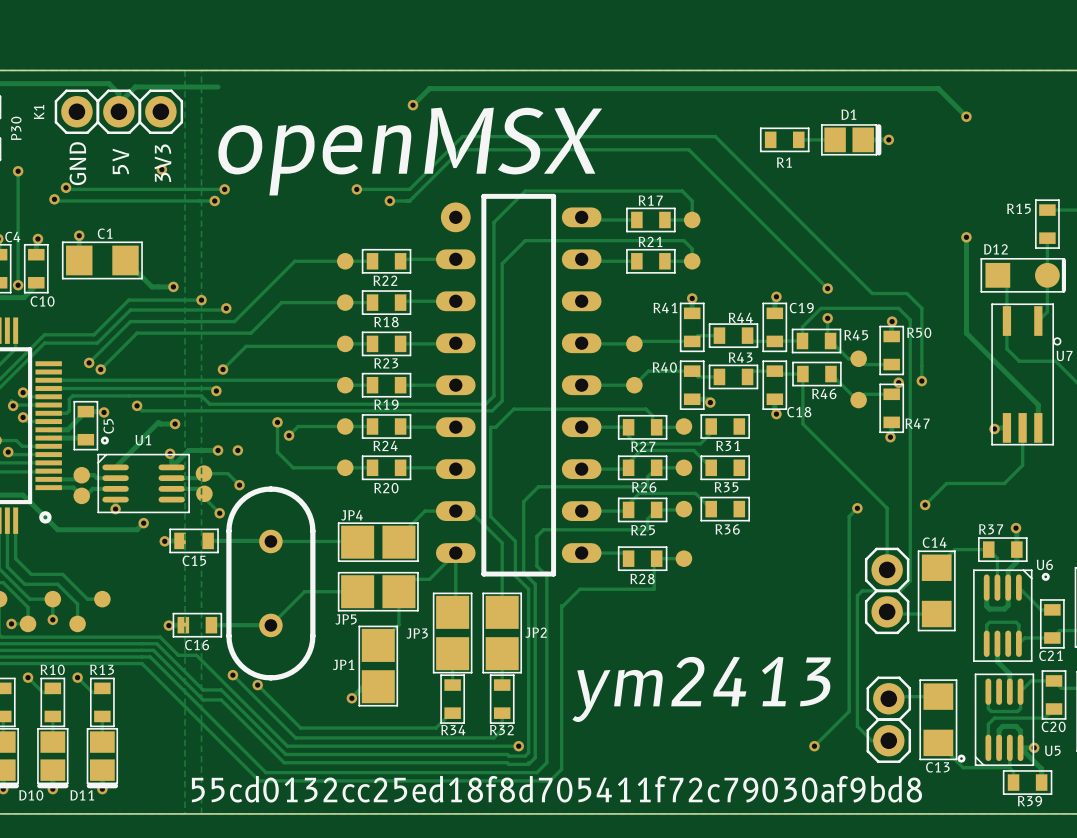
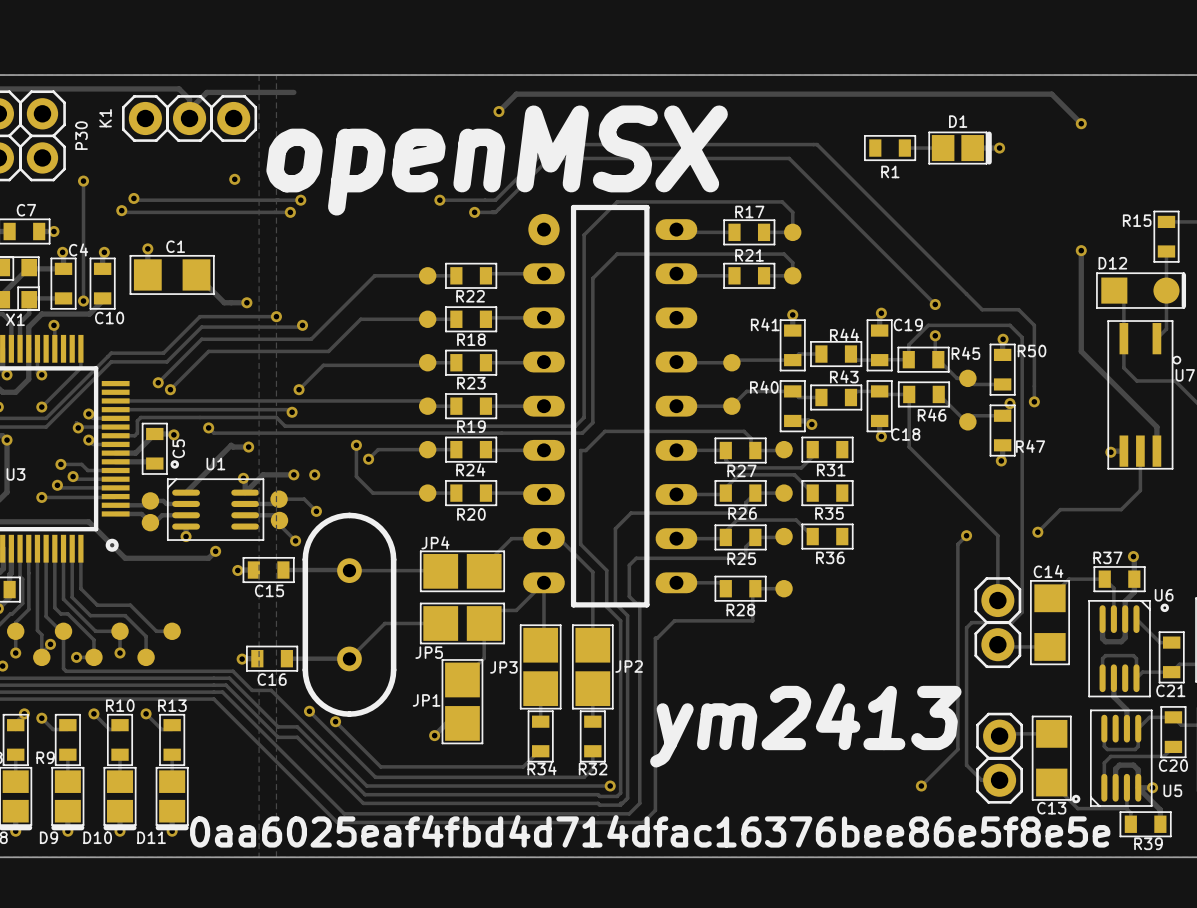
text: 5V (120, 161) -> none
text: GND (77, 163) -> none
text: 3V3 (163, 163) -> none
text: 55cd0132cc25ed18f8d705411f72c79030af9bd8 (556, 789) -> 0aa6025eaf4fbd4d714dfac16376bee86e5f8e5e (650, 831)

